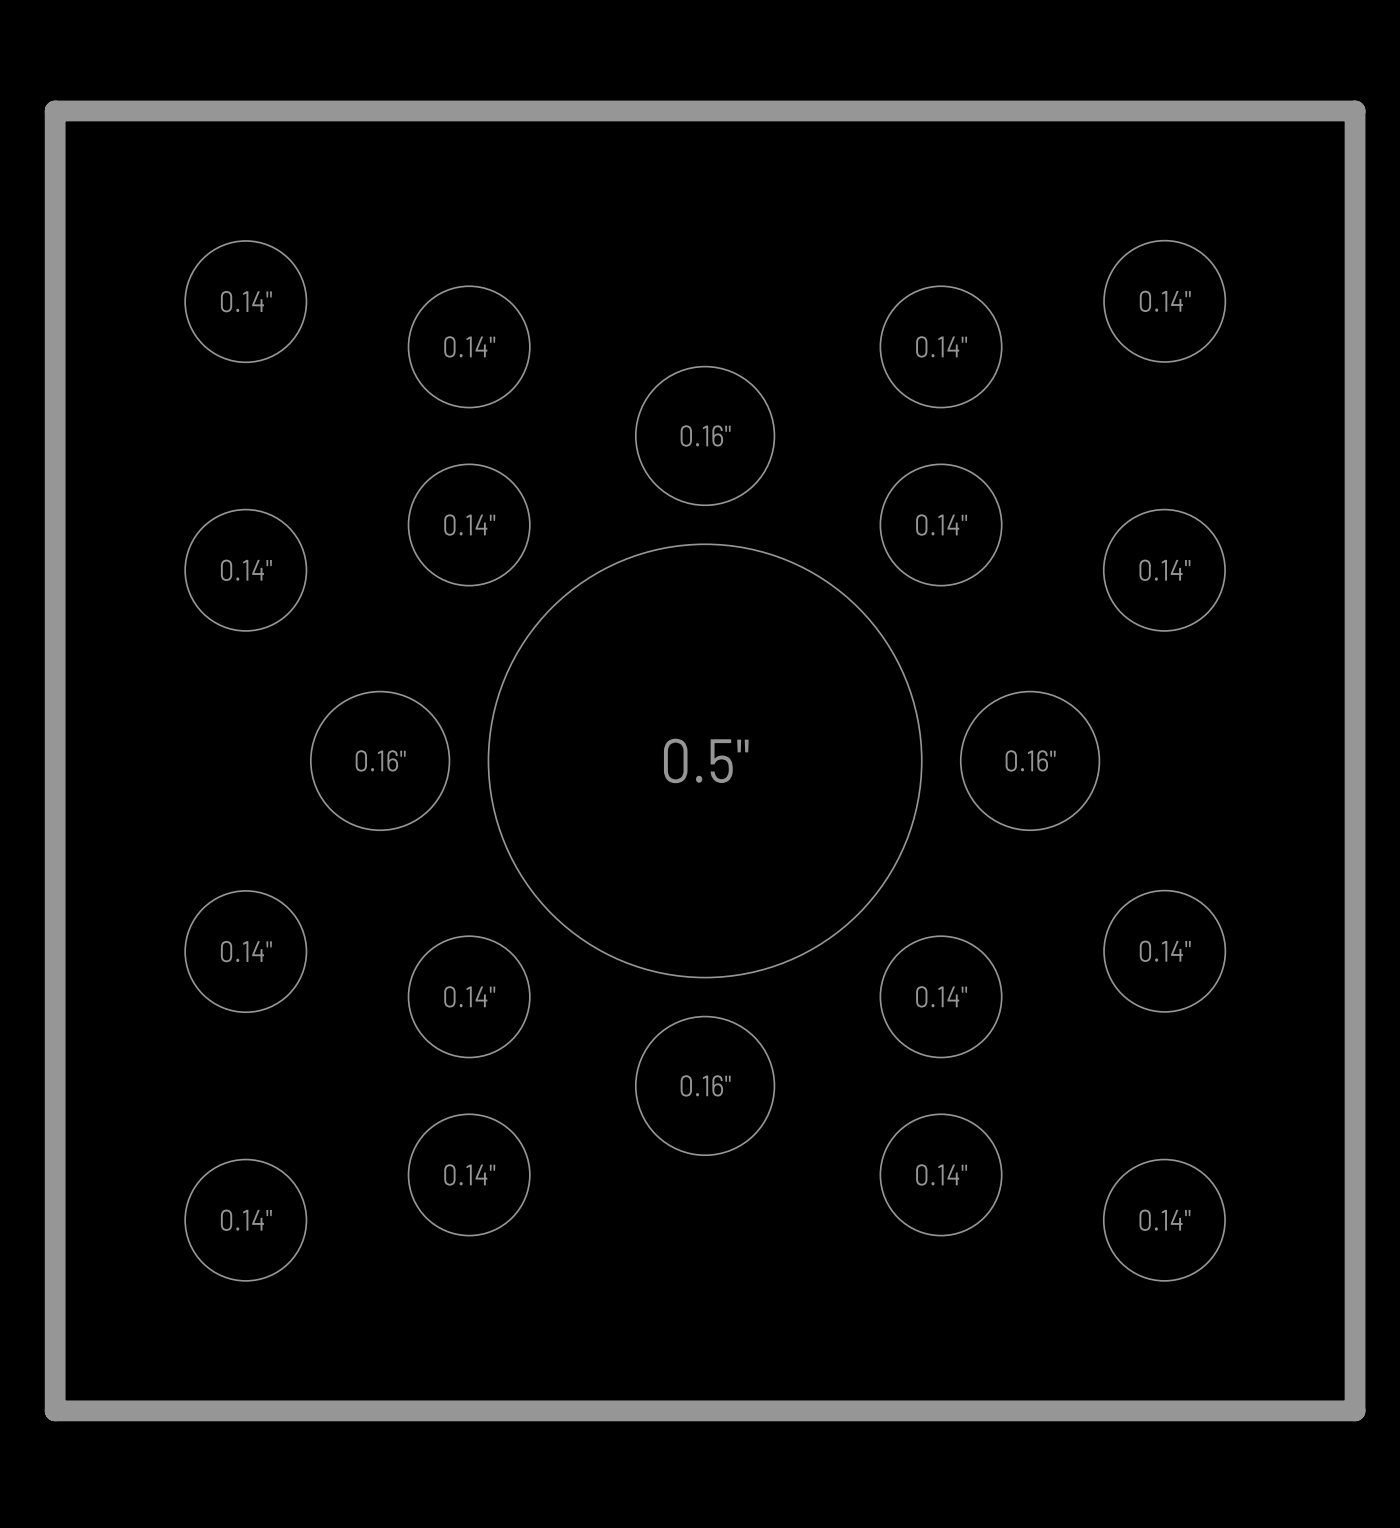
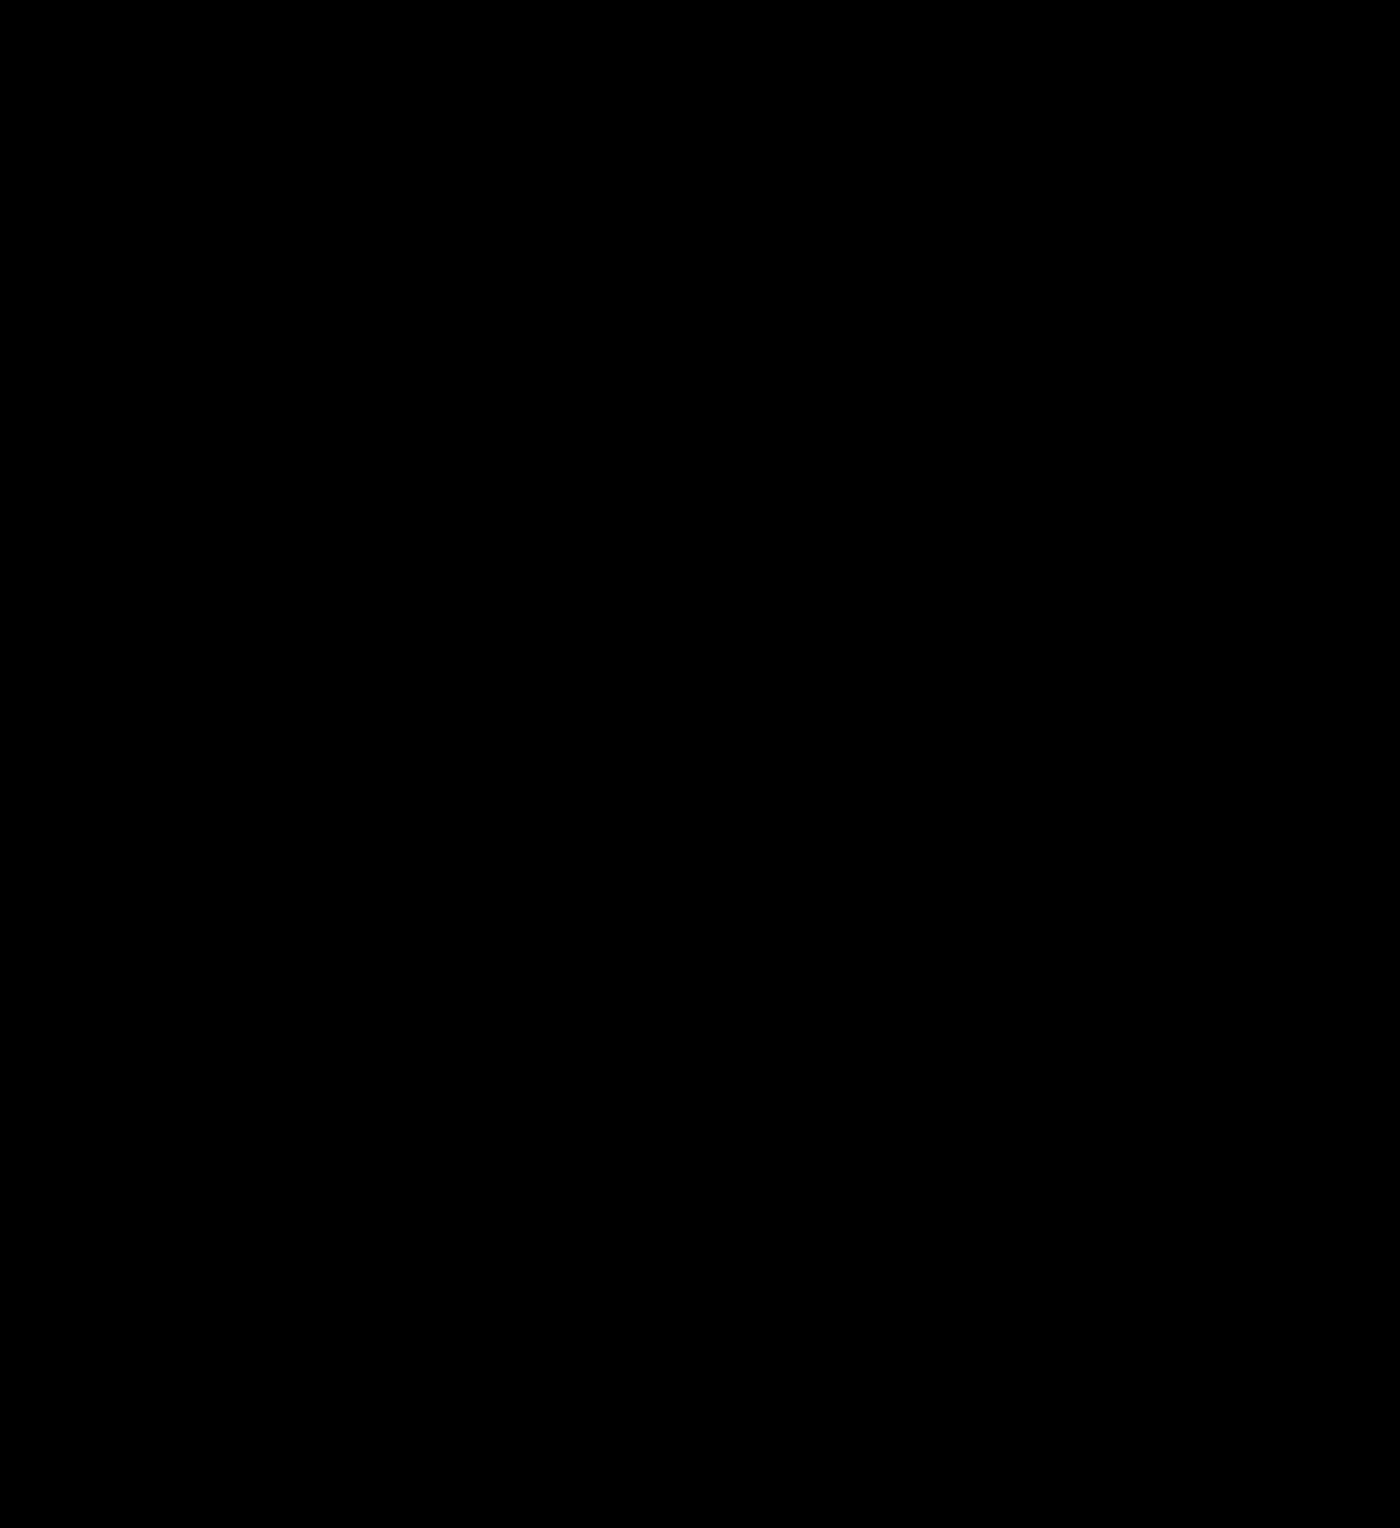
drawing: [44, 100, 1366, 1422] -> none

